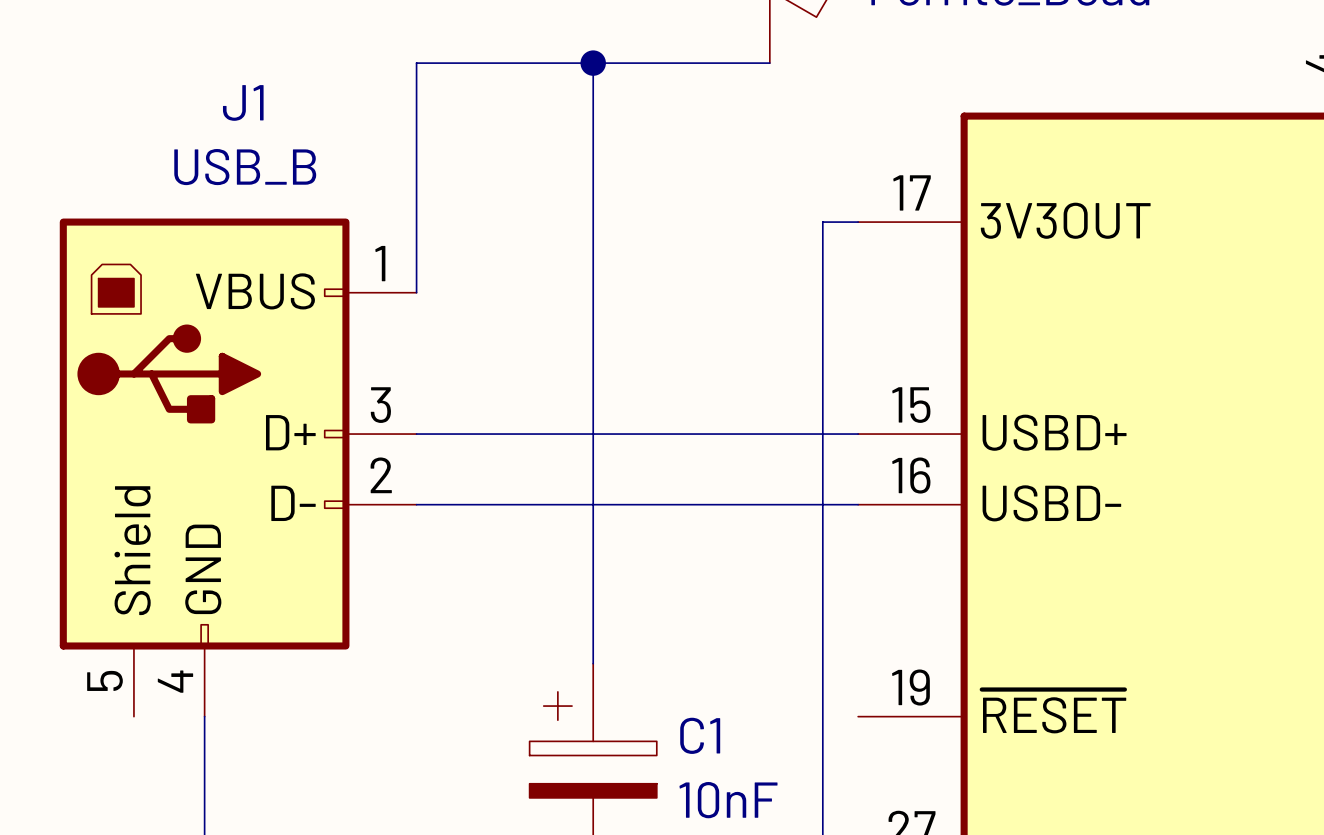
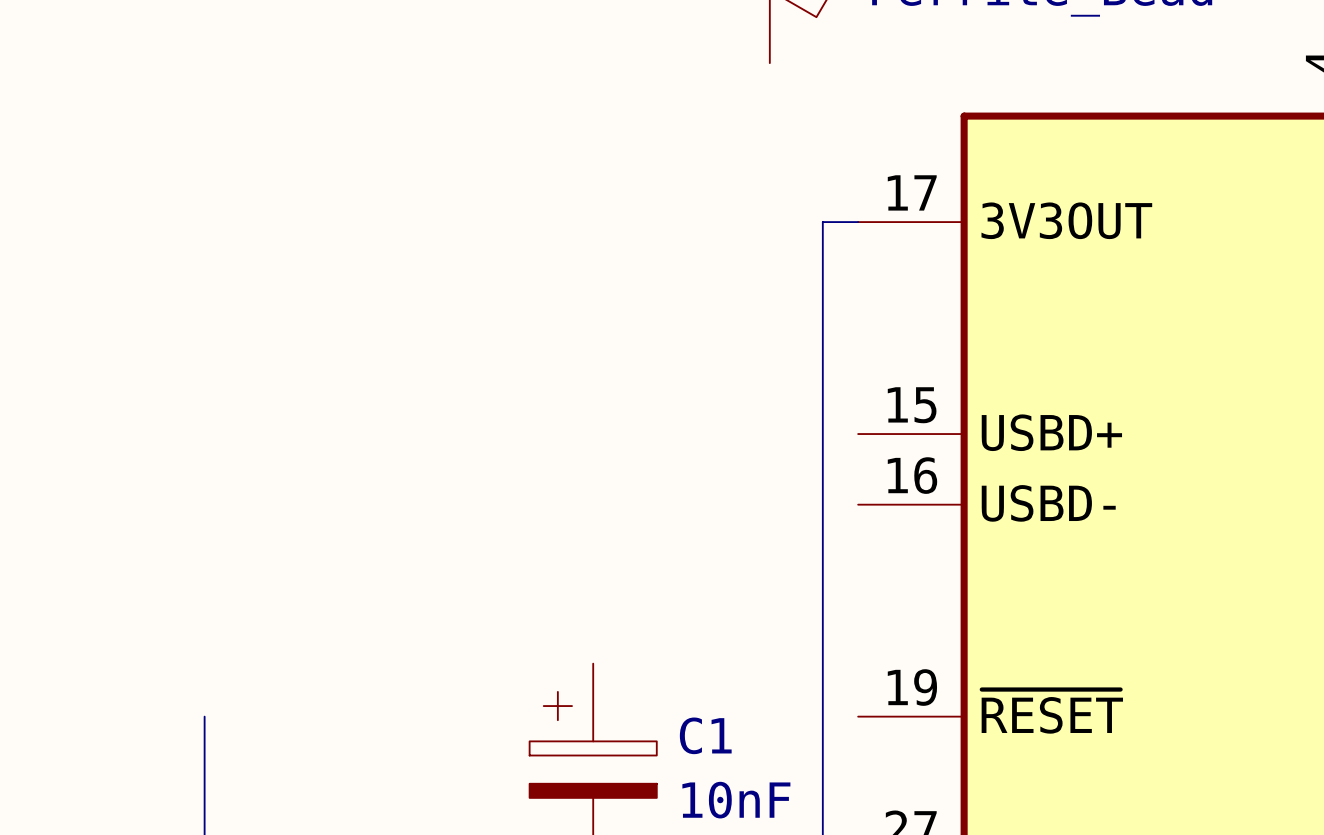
wire: (593, 63) (593, 663) -> none
junction: (593, 63) -> none
wire: (769, 63) (416, 63) (416, 292) -> none
wire: (416, 434) (858, 434) -> none
J1: USB_B (238, 467) -> none
wire: (416, 504) (858, 504) -> none

